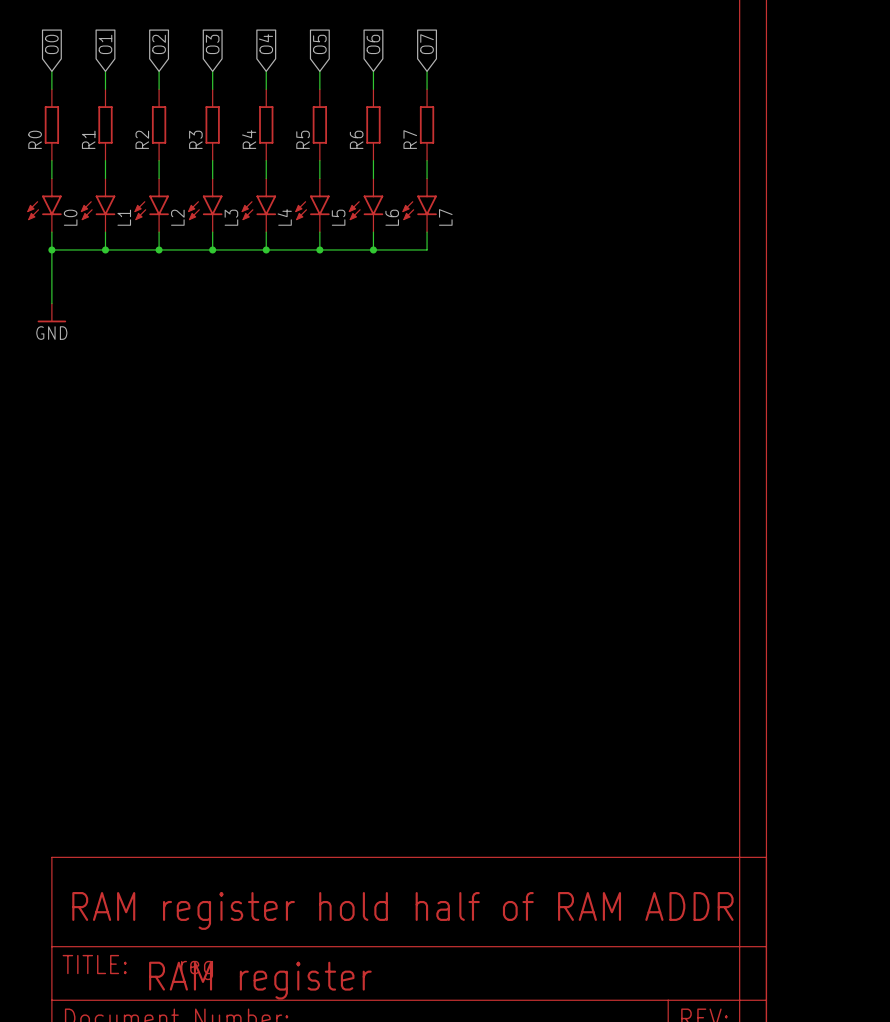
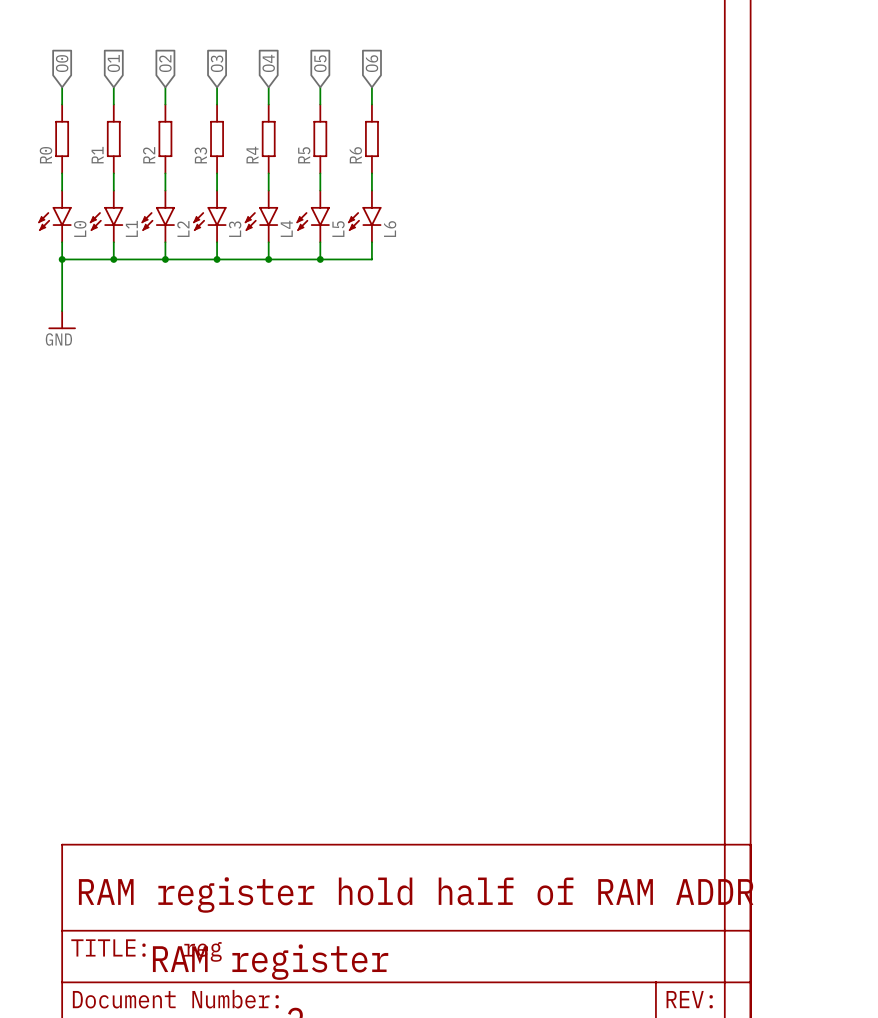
global label: O7 (427, 44) -> none
wire: (427, 71) (427, 89) -> none
R7: (427, 124) -> none
wire: (427, 160) (427, 178) -> none
L7: (419, 205) -> none
wire: (427, 232) (427, 249) (373, 249) -> none
junction: (373, 249) -> none

